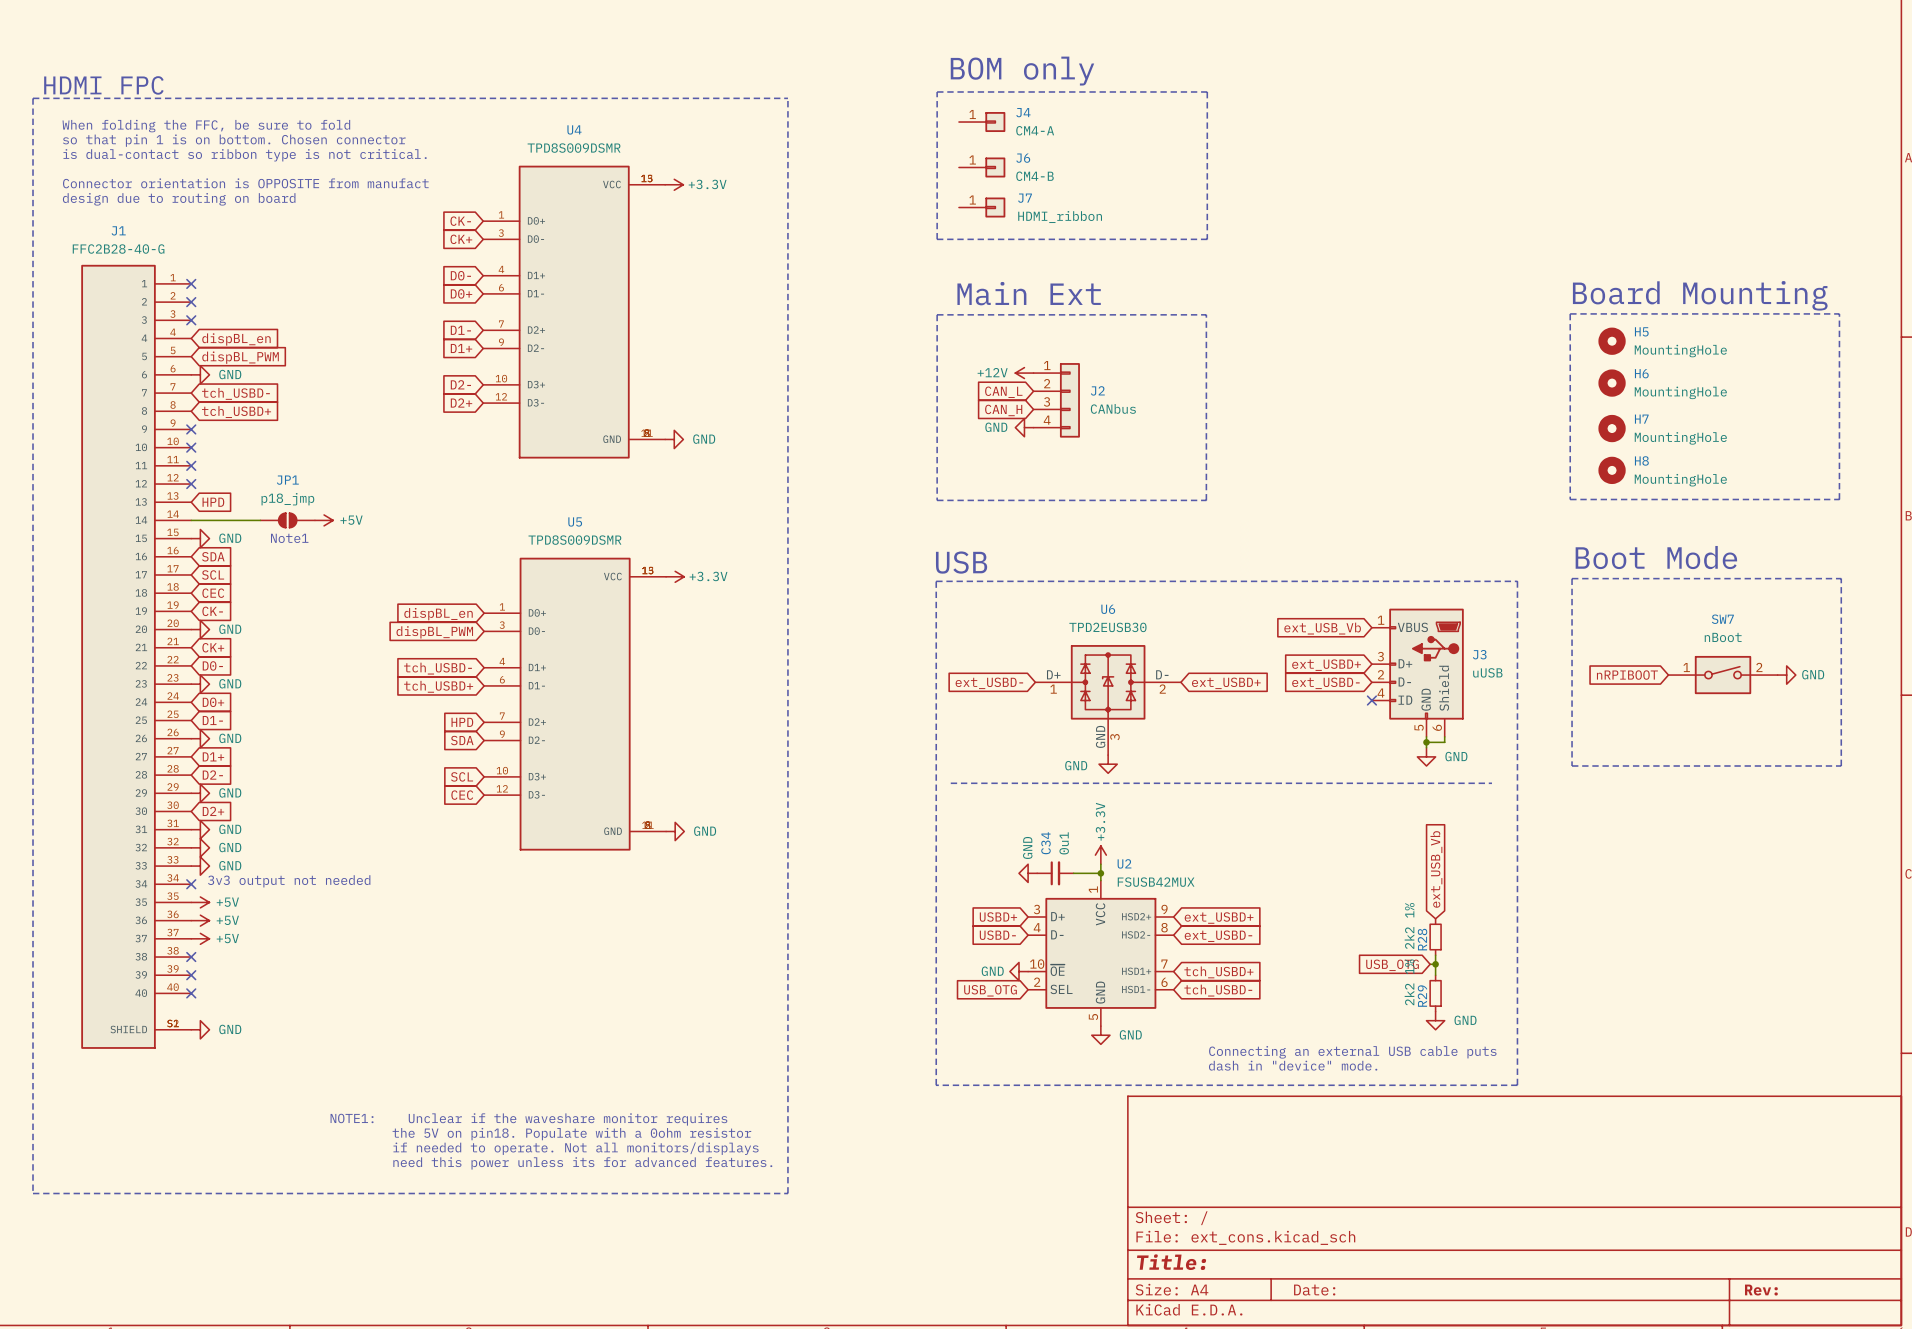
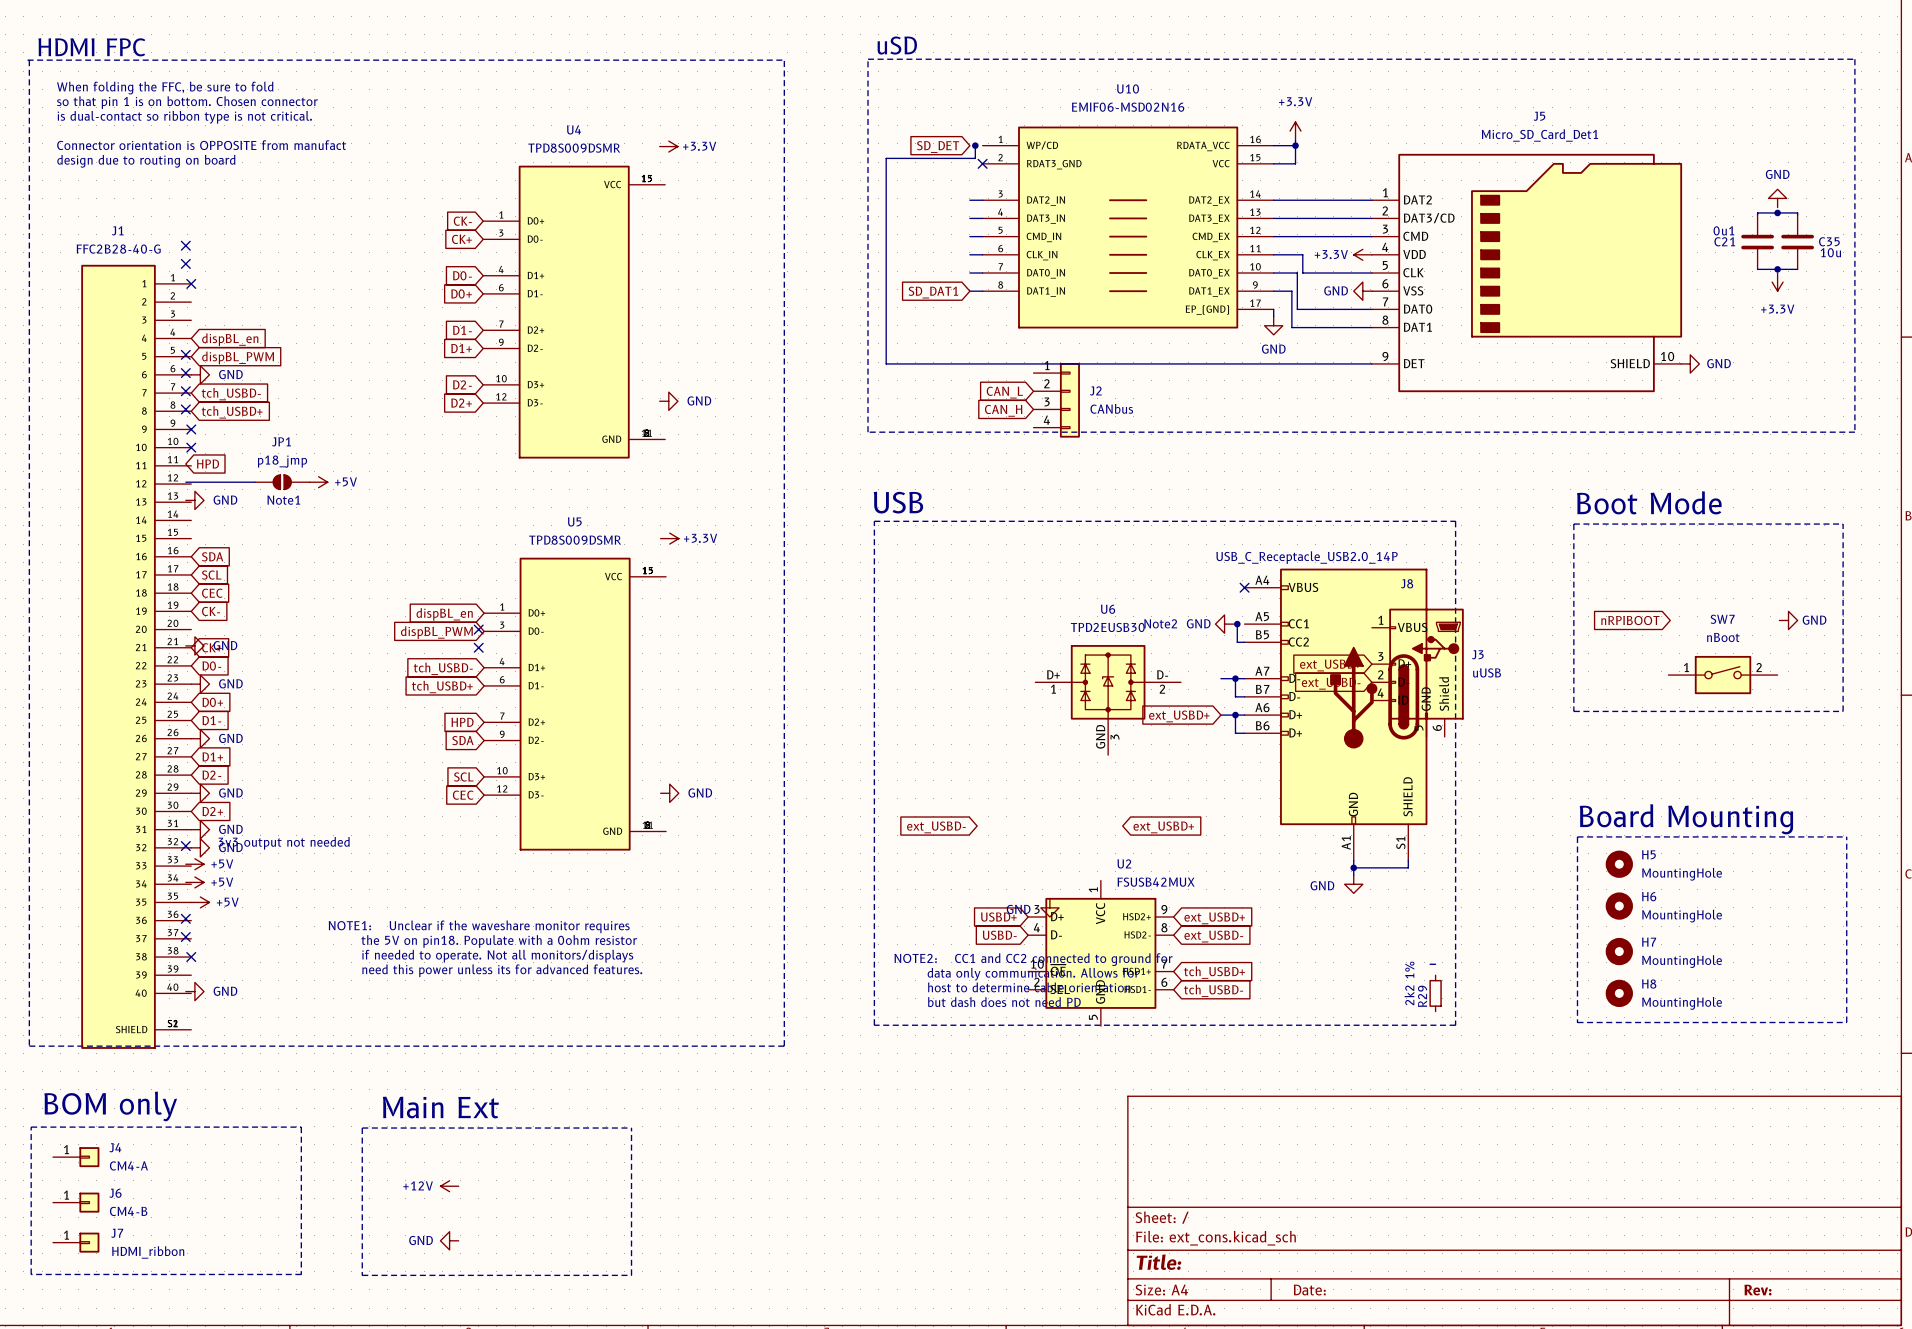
text: none -> uSD (897, 45)
line: none -> (868, 59) (1854, 59) (1854, 432) (868, 432) (868, 59)
line: none -> (27, 60) (782, 60)
line: none -> (29, 60) (29, 1046) (784, 1046) (784, 60)
text: BOM only (1022, 71) -> none
text position: HDMI FPC (103, 85) -> HDMI FPC (91, 47)
line: (937, 91) (937, 239) (1207, 239) (1207, 91) (937, 91) -> none
line: (33, 98) (33, 1193) (787, 1193) (787, 98) (33, 98) -> none
J4 position: (982, 122) -> (76, 1157)
text position: When folding the FFC, be sure to fold (206, 126) -> When folding the FFC, be sure to fold (165, 88)
power symbol: none -> +3.3V (1295, 131)
text position: so that pin 1 is on bottom. Chosen connector (234, 140) -> so that pin 1 is on bottom. Chosen connector (187, 102)
wire: none -> (1295, 140) (1295, 163) (1273, 163)
wire: none -> (975, 145) (975, 158) (886, 158) (886, 363) (1371, 363)
junction: none -> (975, 145)
wire: none -> (1273, 145) (1295, 145)
junction: none -> (1295, 145)
global label: none -> SD_DET (938, 147)
text position: is dual-contact so ribbon type is not critical. (245, 155) -> is dual-contact so ribbon type is not critical. (184, 117)
no-connect mark: none -> (982, 163)
J6 position: (982, 167) -> (76, 1202)
text position: Connector orientation is OPPOSITE from manufact (245, 183) -> Connector orientation is OPPOSITE from manufact (201, 145)
power symbol position: +3.3V (674, 184) -> +3.3V (668, 146)
power symbol: none -> GND (1777, 198)
text position: design due to routing on board (179, 199) -> design due to routing on board (146, 161)
wire: none -> (969, 200) (982, 200)
wire: none -> (1273, 200) (1371, 200)
J7 position: (982, 207) -> (76, 1242)
junction: none -> (1777, 212)
wire: none -> (1757, 214) (1757, 212) (1797, 212) (1797, 214)
wire: none -> (969, 218) (982, 218)
wire: none -> (1273, 218) (1371, 218)
U10: none -> EMIF06-MSD02N16 (1128, 227)
wire: none -> (969, 236) (982, 236)
wire: none -> (1273, 236) (1371, 236)
C21: none -> 0u1 (1757, 242)
C35: none -> 10u (1797, 242)
no-connect mark: none -> (185, 245)
wire: none -> (969, 254) (982, 254)
wire: none -> (1273, 254) (1302, 254) (1302, 273) (1371, 273)
power symbol: none -> +3.3V (1362, 254)
no-connect mark: none -> (185, 263)
wire: none -> (1757, 269) (1797, 269)
junction: none -> (1777, 269)
wire: none -> (969, 273) (982, 273)
wire: none -> (1273, 273) (1297, 273) (1297, 309) (1371, 309)
J5: none -> Micro_SD_Card_Det1 (1527, 273)
power symbol: none -> +3.3V (1777, 282)
wire: none -> (969, 291) (982, 291)
wire: none -> (1273, 291) (1291, 291) (1291, 327) (1371, 327)
power symbol: none -> GND (1362, 291)
global label: none -> SD_DAT1 (933, 292)
text: Main Ext (1029, 293) -> none
text: Board Mounting (1700, 295) -> none
no-connect mark: (191, 302) -> none
wire: none -> (1273, 309) (1273, 316)
line: (1570, 313) (1839, 313) (1839, 499) (1570, 499) (1570, 313) -> none
line: (937, 314) (937, 500) (1206, 500) (1206, 314) (937, 314) -> none
no-connect mark: (191, 320) -> none
power symbol: none -> GND (1273, 325)
H5 position: (1612, 341) -> (1619, 864)
no-connect mark: none -> (185, 354)
power symbol: none -> GND (1690, 363)
no-connect mark: none -> (185, 373)
power symbol: +12V (1024, 373) -> none
H6 position: (1612, 383) -> (1619, 906)
no-connect mark: none -> (185, 391)
no-connect mark: none -> (185, 409)
power symbol: GND (1024, 427) -> none
H7 position: (1612, 428) -> (1619, 951)
power symbol position: GND (674, 439) -> GND (668, 401)
no-connect mark: (191, 465) -> none
H8 position: (1612, 470) -> (1619, 993)
no-connect mark: (191, 484) -> none
global label position: HPD (213, 502) -> HPD (207, 464)
wire: (191, 520) (260, 520) -> (185, 482) (254, 482)
JP1 position: (287, 520) -> (282, 482)
power symbol position: +5V (324, 520) -> +5V (318, 482)
power symbol position: GND (200, 538) -> GND (194, 500)
text position: Note1 (289, 538) -> Note1 (283, 500)
text position: Boot Mode (1656, 557) -> Boot Mode (1649, 502)
text position: USB (961, 562) -> USB (898, 502)
power symbol position: +3.3V (675, 576) -> +3.3V (669, 538)
line: (1572, 578) (1572, 766) (1841, 766) (1841, 578) (1572, 578) -> (1573, 524) (1573, 711) (1843, 711) (1843, 524) (1573, 524)
line: (936, 581) (1517, 581) (1517, 1085) (936, 1085) (936, 581) -> (874, 521) (1455, 521) (1455, 1025) (874, 1025) (874, 521)
no-connect mark: none -> (1244, 587)
text: none -> Note2 (1160, 623)
power symbol: none -> GND (1224, 624)
wire: none -> (1237, 624) (1237, 642) (1244, 642)
junction: none -> (1237, 624)
global label: ext_USB_Vb (1322, 628) -> none
power symbol position: GND (200, 629) -> GND (194, 645)
no-connect mark: none -> (478, 629)
no-connect mark: none -> (478, 647)
global label position: nRPIBOOT (1627, 675) -> nRPIBOOT (1630, 620)
power symbol position: GND (1786, 675) -> GND (1788, 620)
wire: none -> (1220, 678) (1244, 678)
wire: none -> (1235, 678) (1235, 696) (1244, 696)
junction: none -> (1235, 678)
global label position: ext_USBD- (989, 683) -> ext_USBD- (936, 827)
global label rotation: 0° (1226, 683) -> 180° (1179, 716)
no-connect mark: (1371, 700) -> none
J8: none -> USB_C_Receptacle_USB2.0_14P (1335, 714)
wire: none -> (1220, 715) (1244, 715)
wire: none -> (1235, 715) (1235, 733) (1244, 733)
junction: none -> (1235, 715)
wire: (1444, 736) (1444, 742) (1426, 742) -> none
junction: (1426, 742) -> none
power symbol: GND (1426, 756) -> none
power symbol: GND (1108, 764) -> none
line: (950, 783) (1491, 783) -> none
text: none -> Board Mounting (1686, 819)
global label: none -> ext_USBD+ (1163, 827)
power symbol position: GND (675, 831) -> GND (669, 793)
line: none -> (1577, 836) (1846, 836) (1846, 1022) (1577, 1022) (1577, 836)
no-connect mark: none -> (185, 846)
power symbol: +3.3V (1100, 855) -> none
wire: none -> (1353, 860) (1353, 875)
wire: none -> (1408, 860) (1408, 867) (1353, 867)
wire: (1100, 864) (1100, 880) -> none
power symbol: GND (200, 866) -> +5V (194, 864)
junction: none -> (1353, 867)
global label: ext_USB_Vb (1436, 869) -> none
power symbol: GND (1028, 873) -> none
C34: 0u1 (1055, 873) -> none
wire: (1073, 873) (1100, 873) -> none
junction: (1100, 873) -> none
text position: 3v3 output not needed (289, 881) -> 3v3 output not needed (284, 843)
power symbol: none -> +5V (194, 882)
no-connect mark: (191, 884) -> none
power symbol: none -> GND (1353, 884)
power symbol: none -> GND (1049, 907)
no-connect mark: none -> (185, 918)
power symbol: +5V (200, 920) -> none
text: none -> NOTE1: Unclear if the waveshare monitor requires (479, 926)
no-connect mark: none -> (185, 937)
R28: 2k2 1% (1435, 937) -> none
power symbol: +5V (200, 938) -> none
text: none -> the 5V on pin18. Populate with a 0ohm resistor (499, 941)
text: none -> if needed to operate. Not all monitors/displays (497, 956)
wire: (1435, 955) (1435, 975) -> none
text: none -> NOTE2: CC1 and CC2 connected to ground for (1033, 959)
junction: (1435, 964) -> none
global label: USB_OTG (1392, 965) -> none
text: none -> need this power unless its for advanced features. (502, 970)
power symbol: GND (1019, 971) -> none
text: none -> data only communication. Allows for (1033, 974)
no-connect mark: (191, 975) -> none
text: none -> host to determine cable orientation (1029, 987)
global label: USB_OTG (990, 990) -> none
no-connect mark: (191, 993) -> none
text: none -> but dash does not need PD (1004, 1002)
power symbol: GND (1435, 1020) -> none
power symbol position: GND (200, 1029) -> GND (194, 991)
power symbol: GND (1100, 1035) -> none
text: Connecting an external USB cable puts (1352, 1052) -> none
text: dash in "device" mode. (1293, 1065) -> none
text: none -> BOM only (110, 1106)
text: none -> Main Ext (440, 1107)
text: NOTE1: Unclear if the waveshare monitor requires (528, 1119) -> none
line: none -> (31, 1127) (301, 1127) (301, 1274) (31, 1274) (31, 1127)
line: none -> (362, 1128) (362, 1275) (631, 1275) (631, 1128) (362, 1128)
text: the 5V on pin18. Populate with a 0ohm resistor (571, 1134) -> none
text: if needed to operate. Not all monitors/displays (576, 1148) -> none
text: need this power unless its for advanced features. (582, 1163) -> none
power symbol: none -> +12V (449, 1186)
power symbol: none -> GND (449, 1240)

